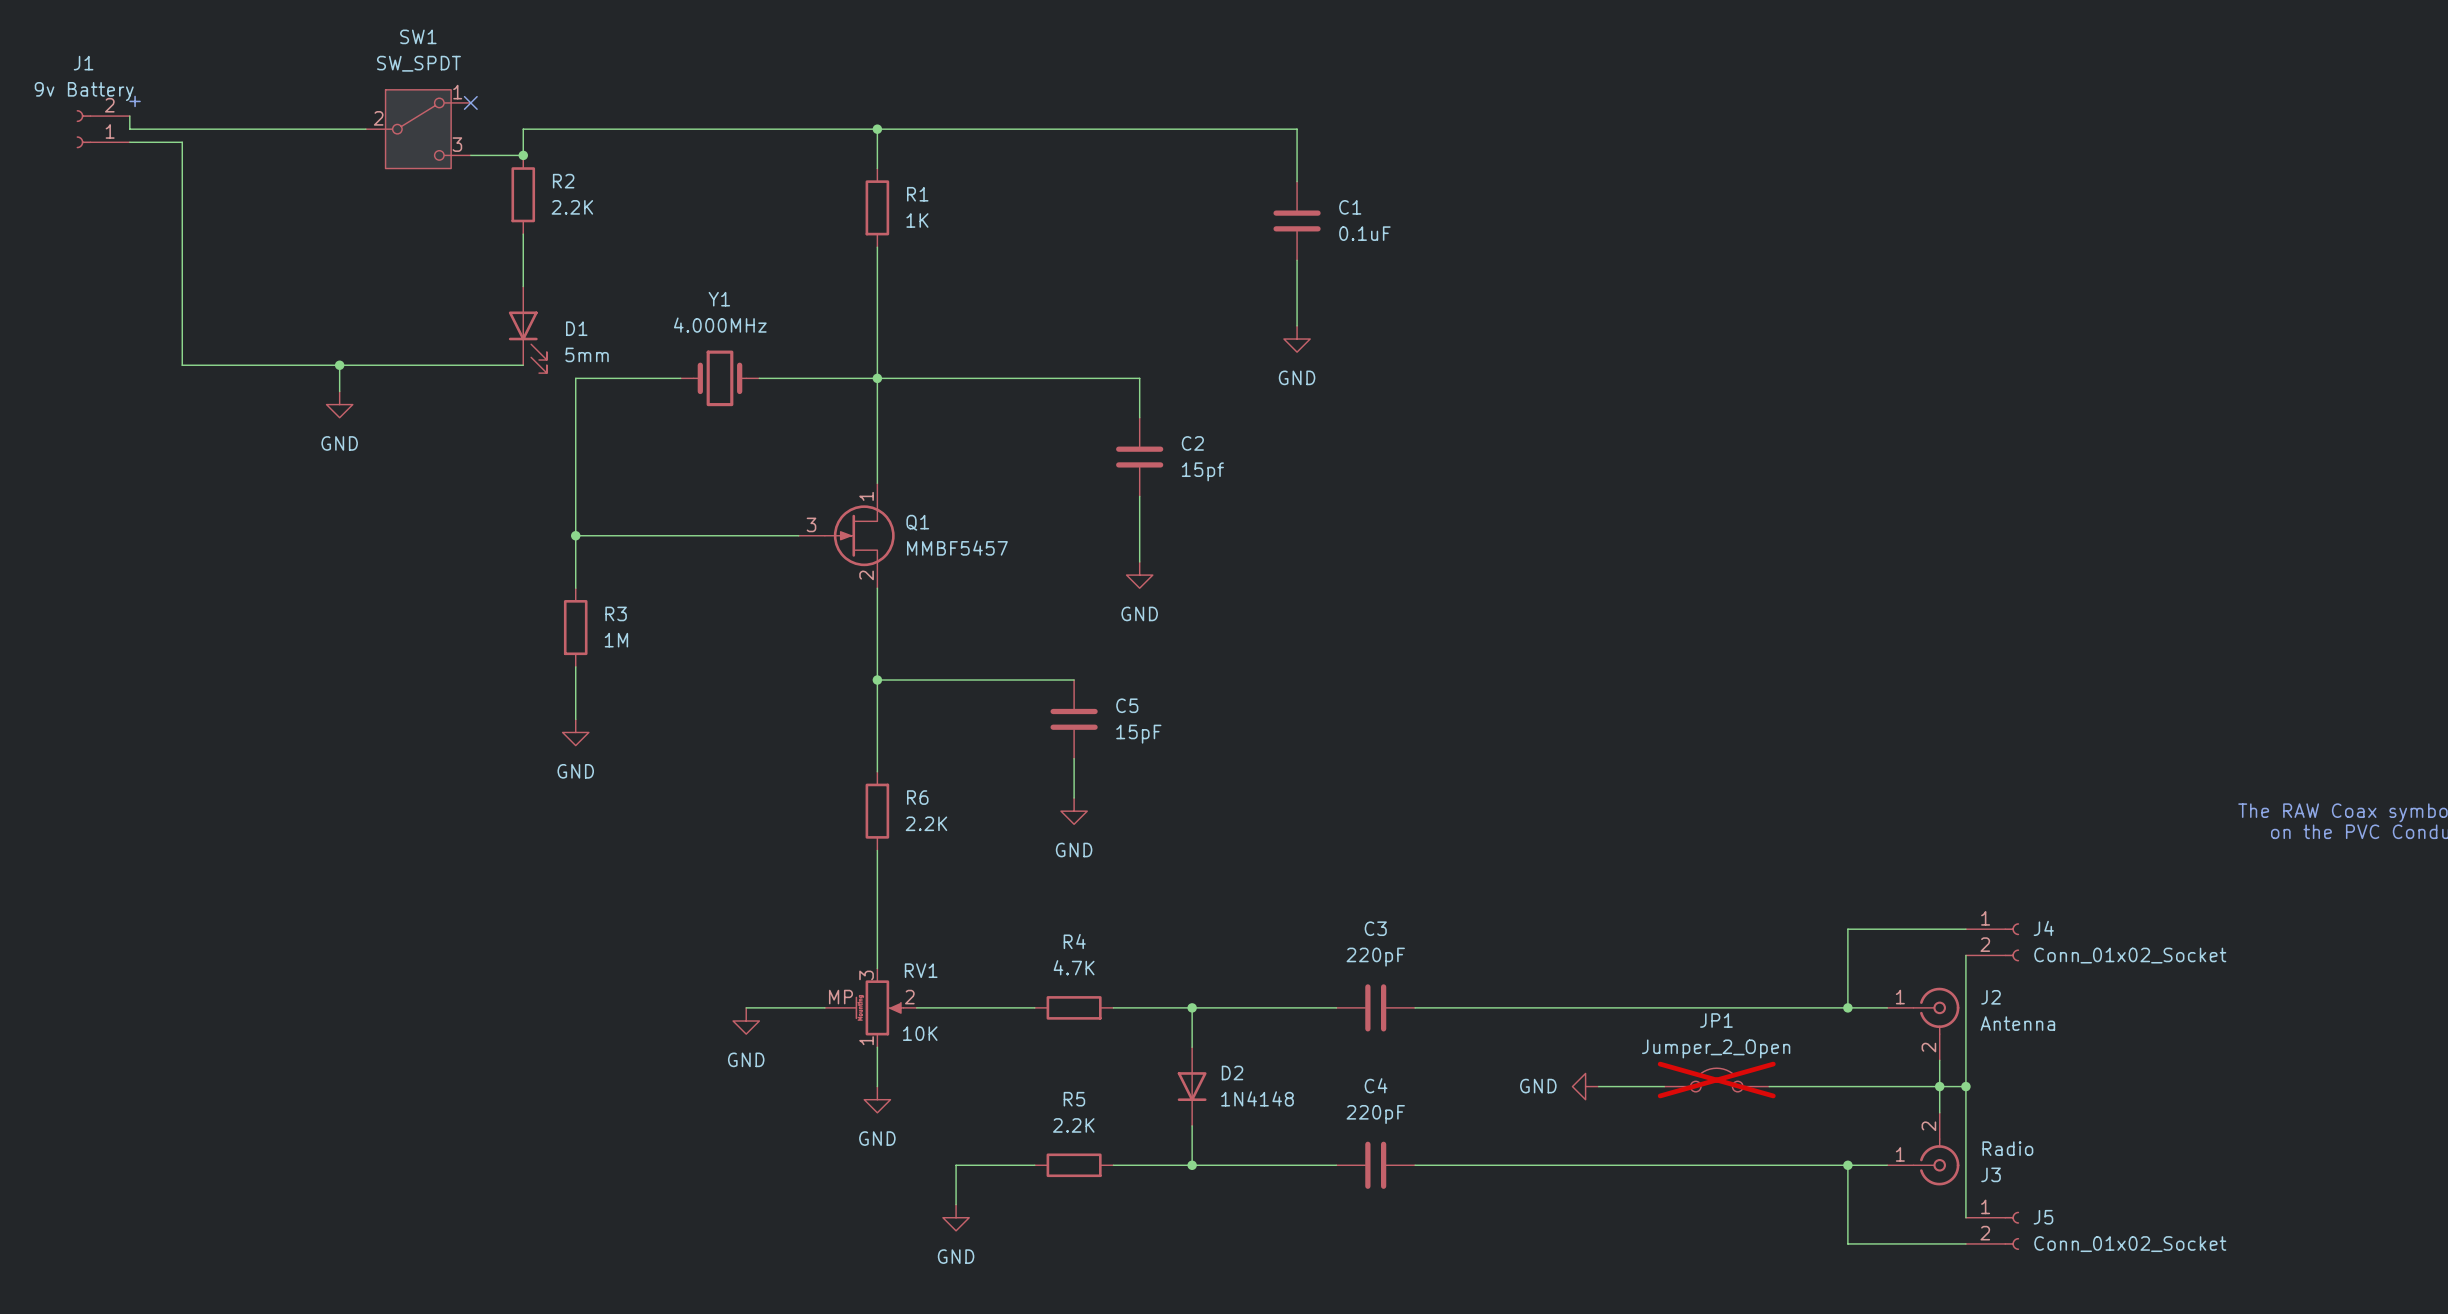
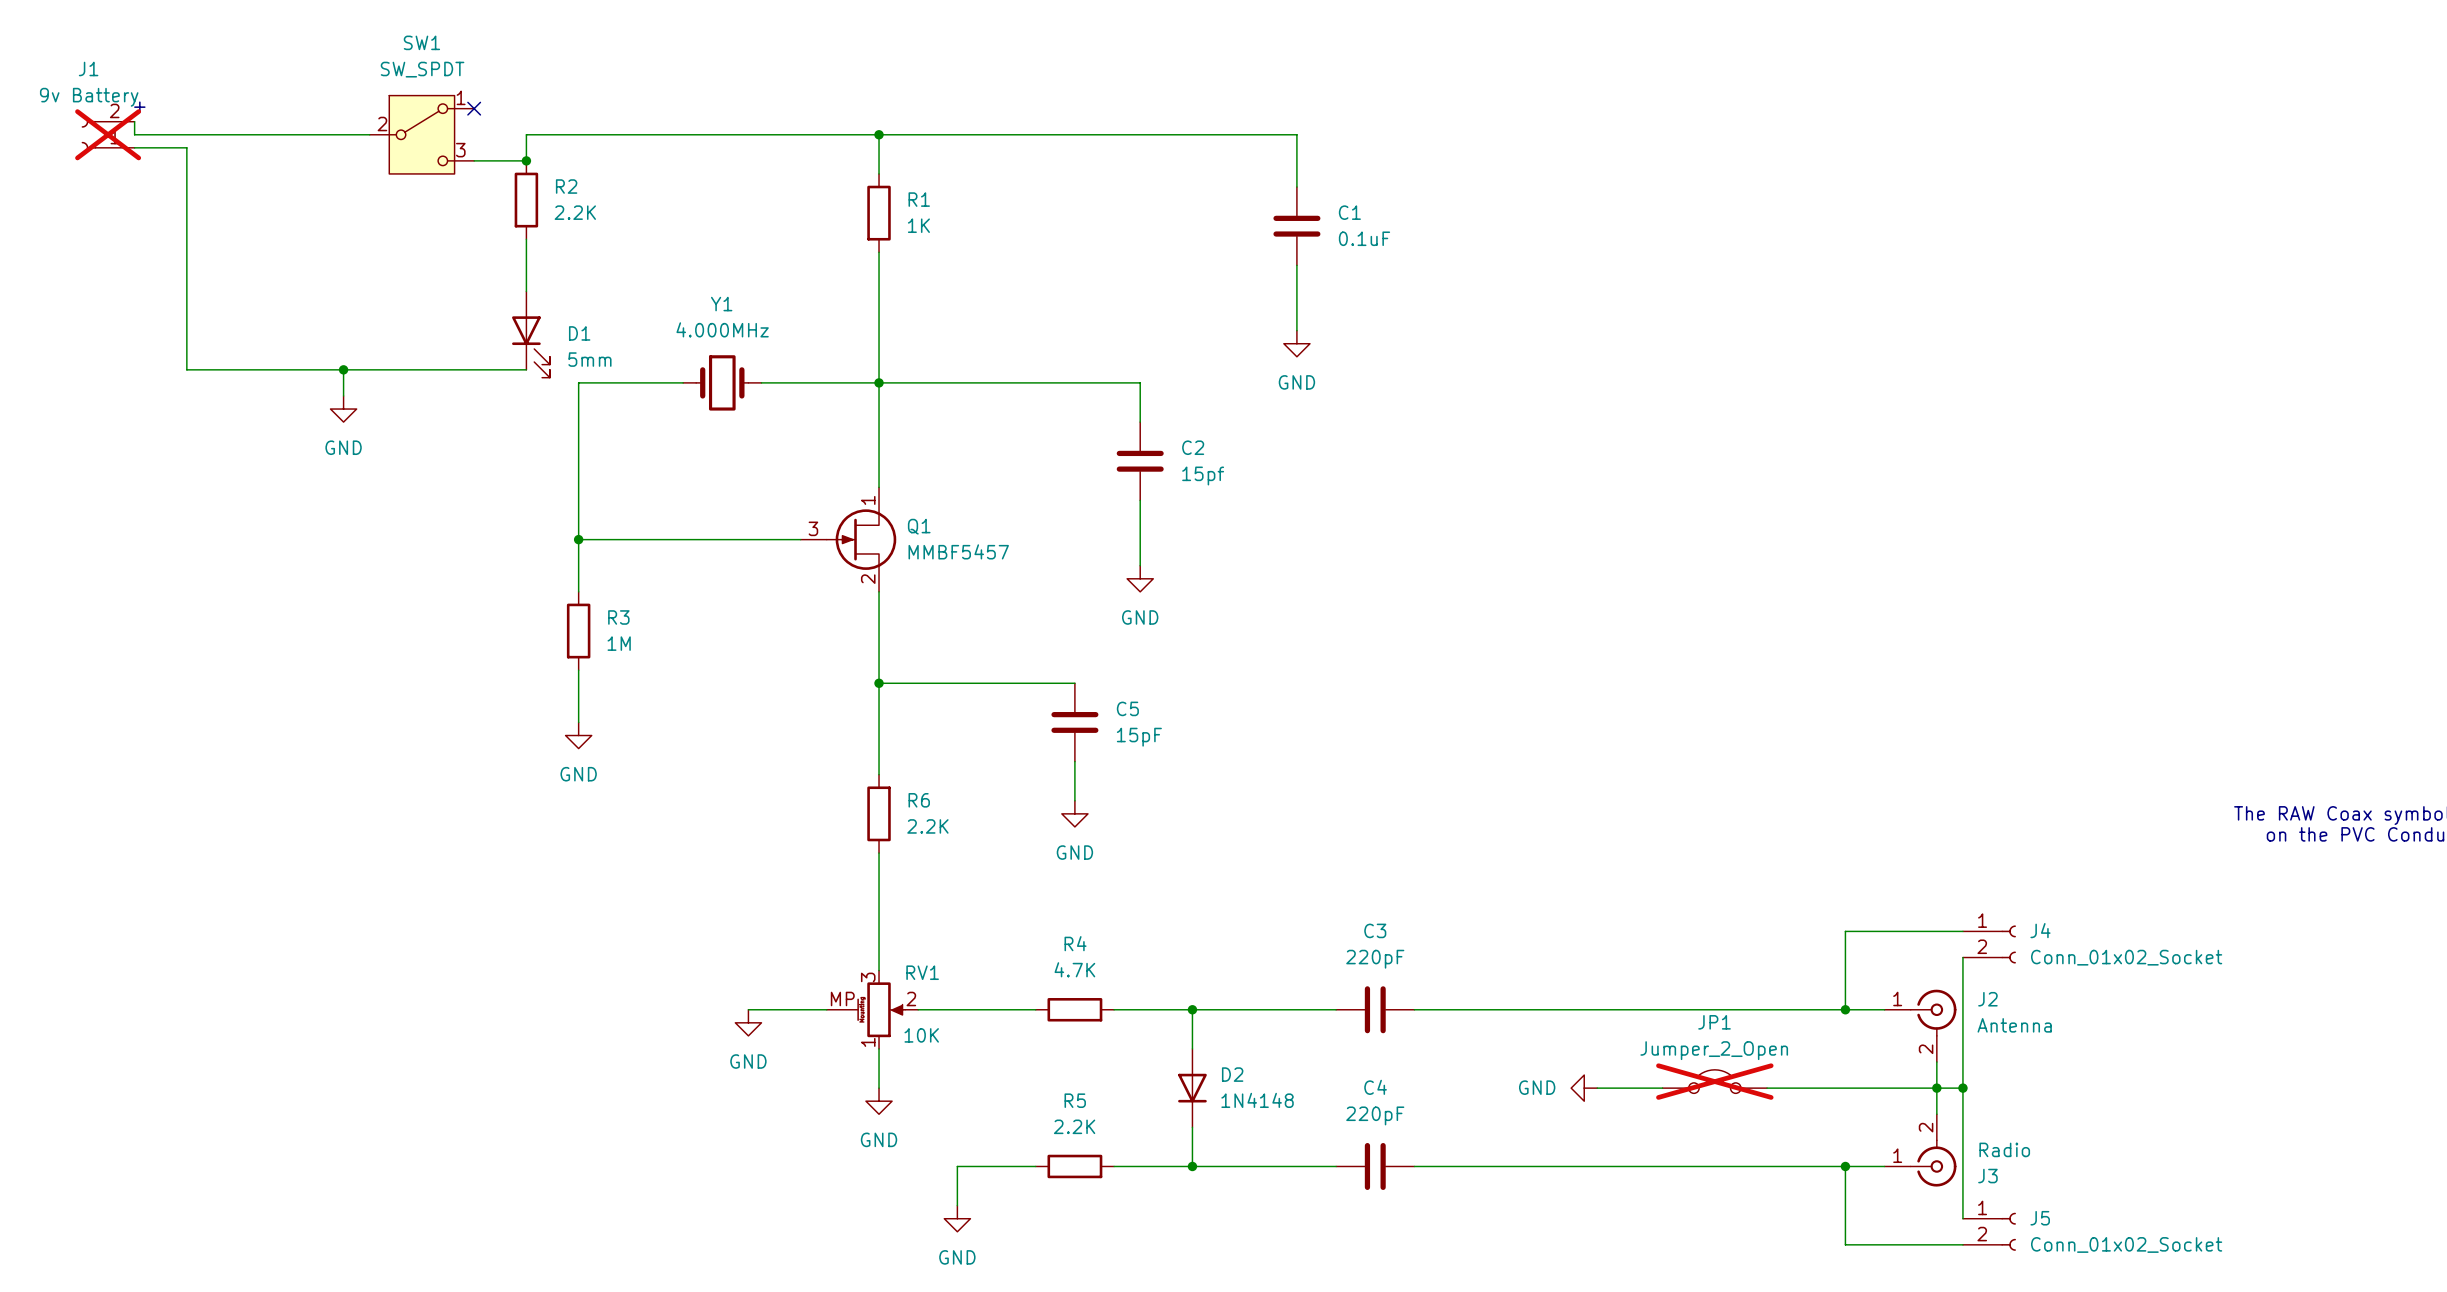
J1 do-not-place cross: none -> (108, 134)

